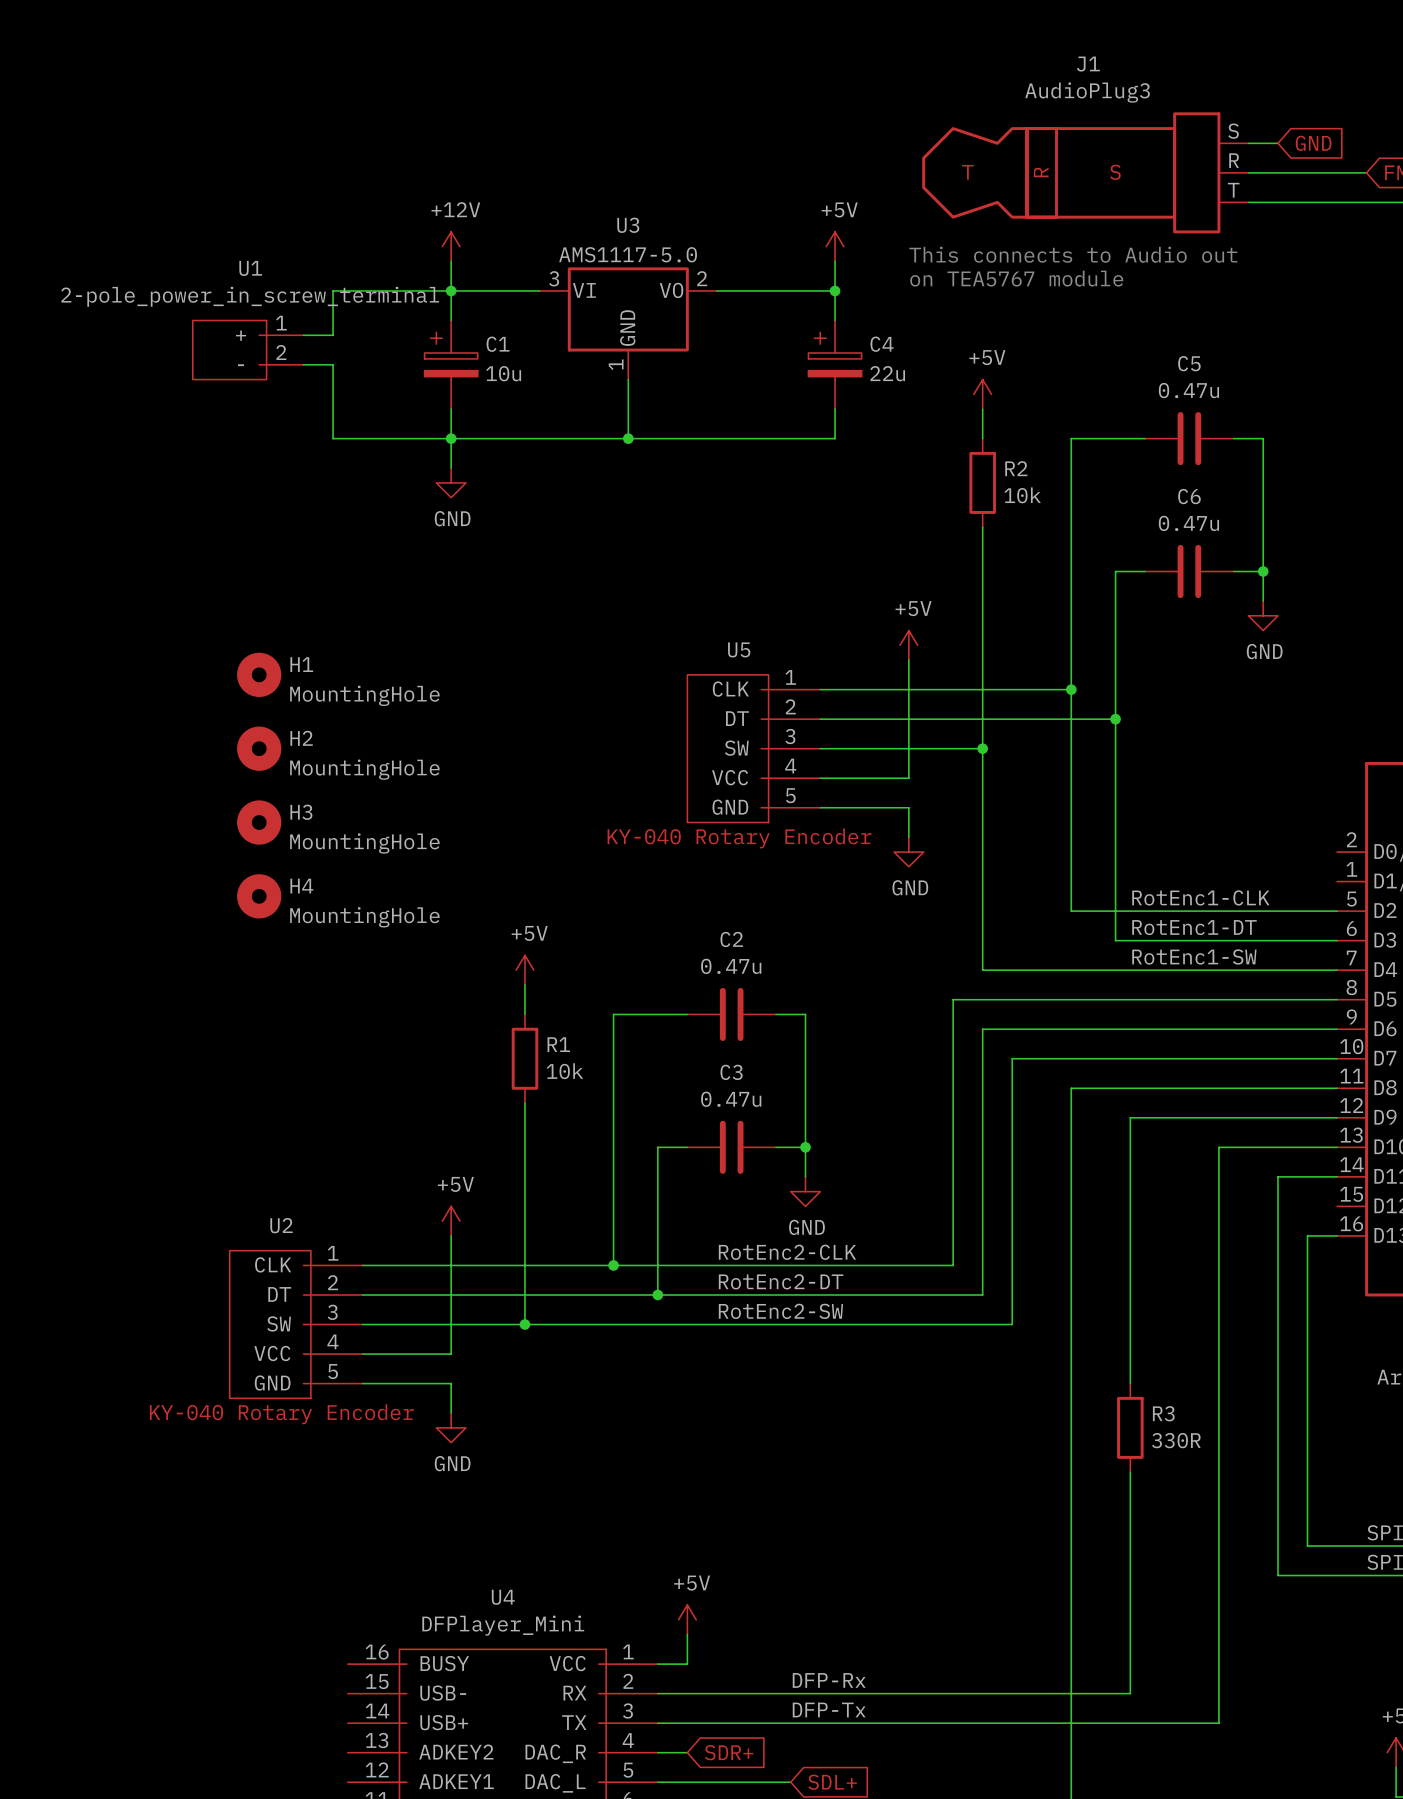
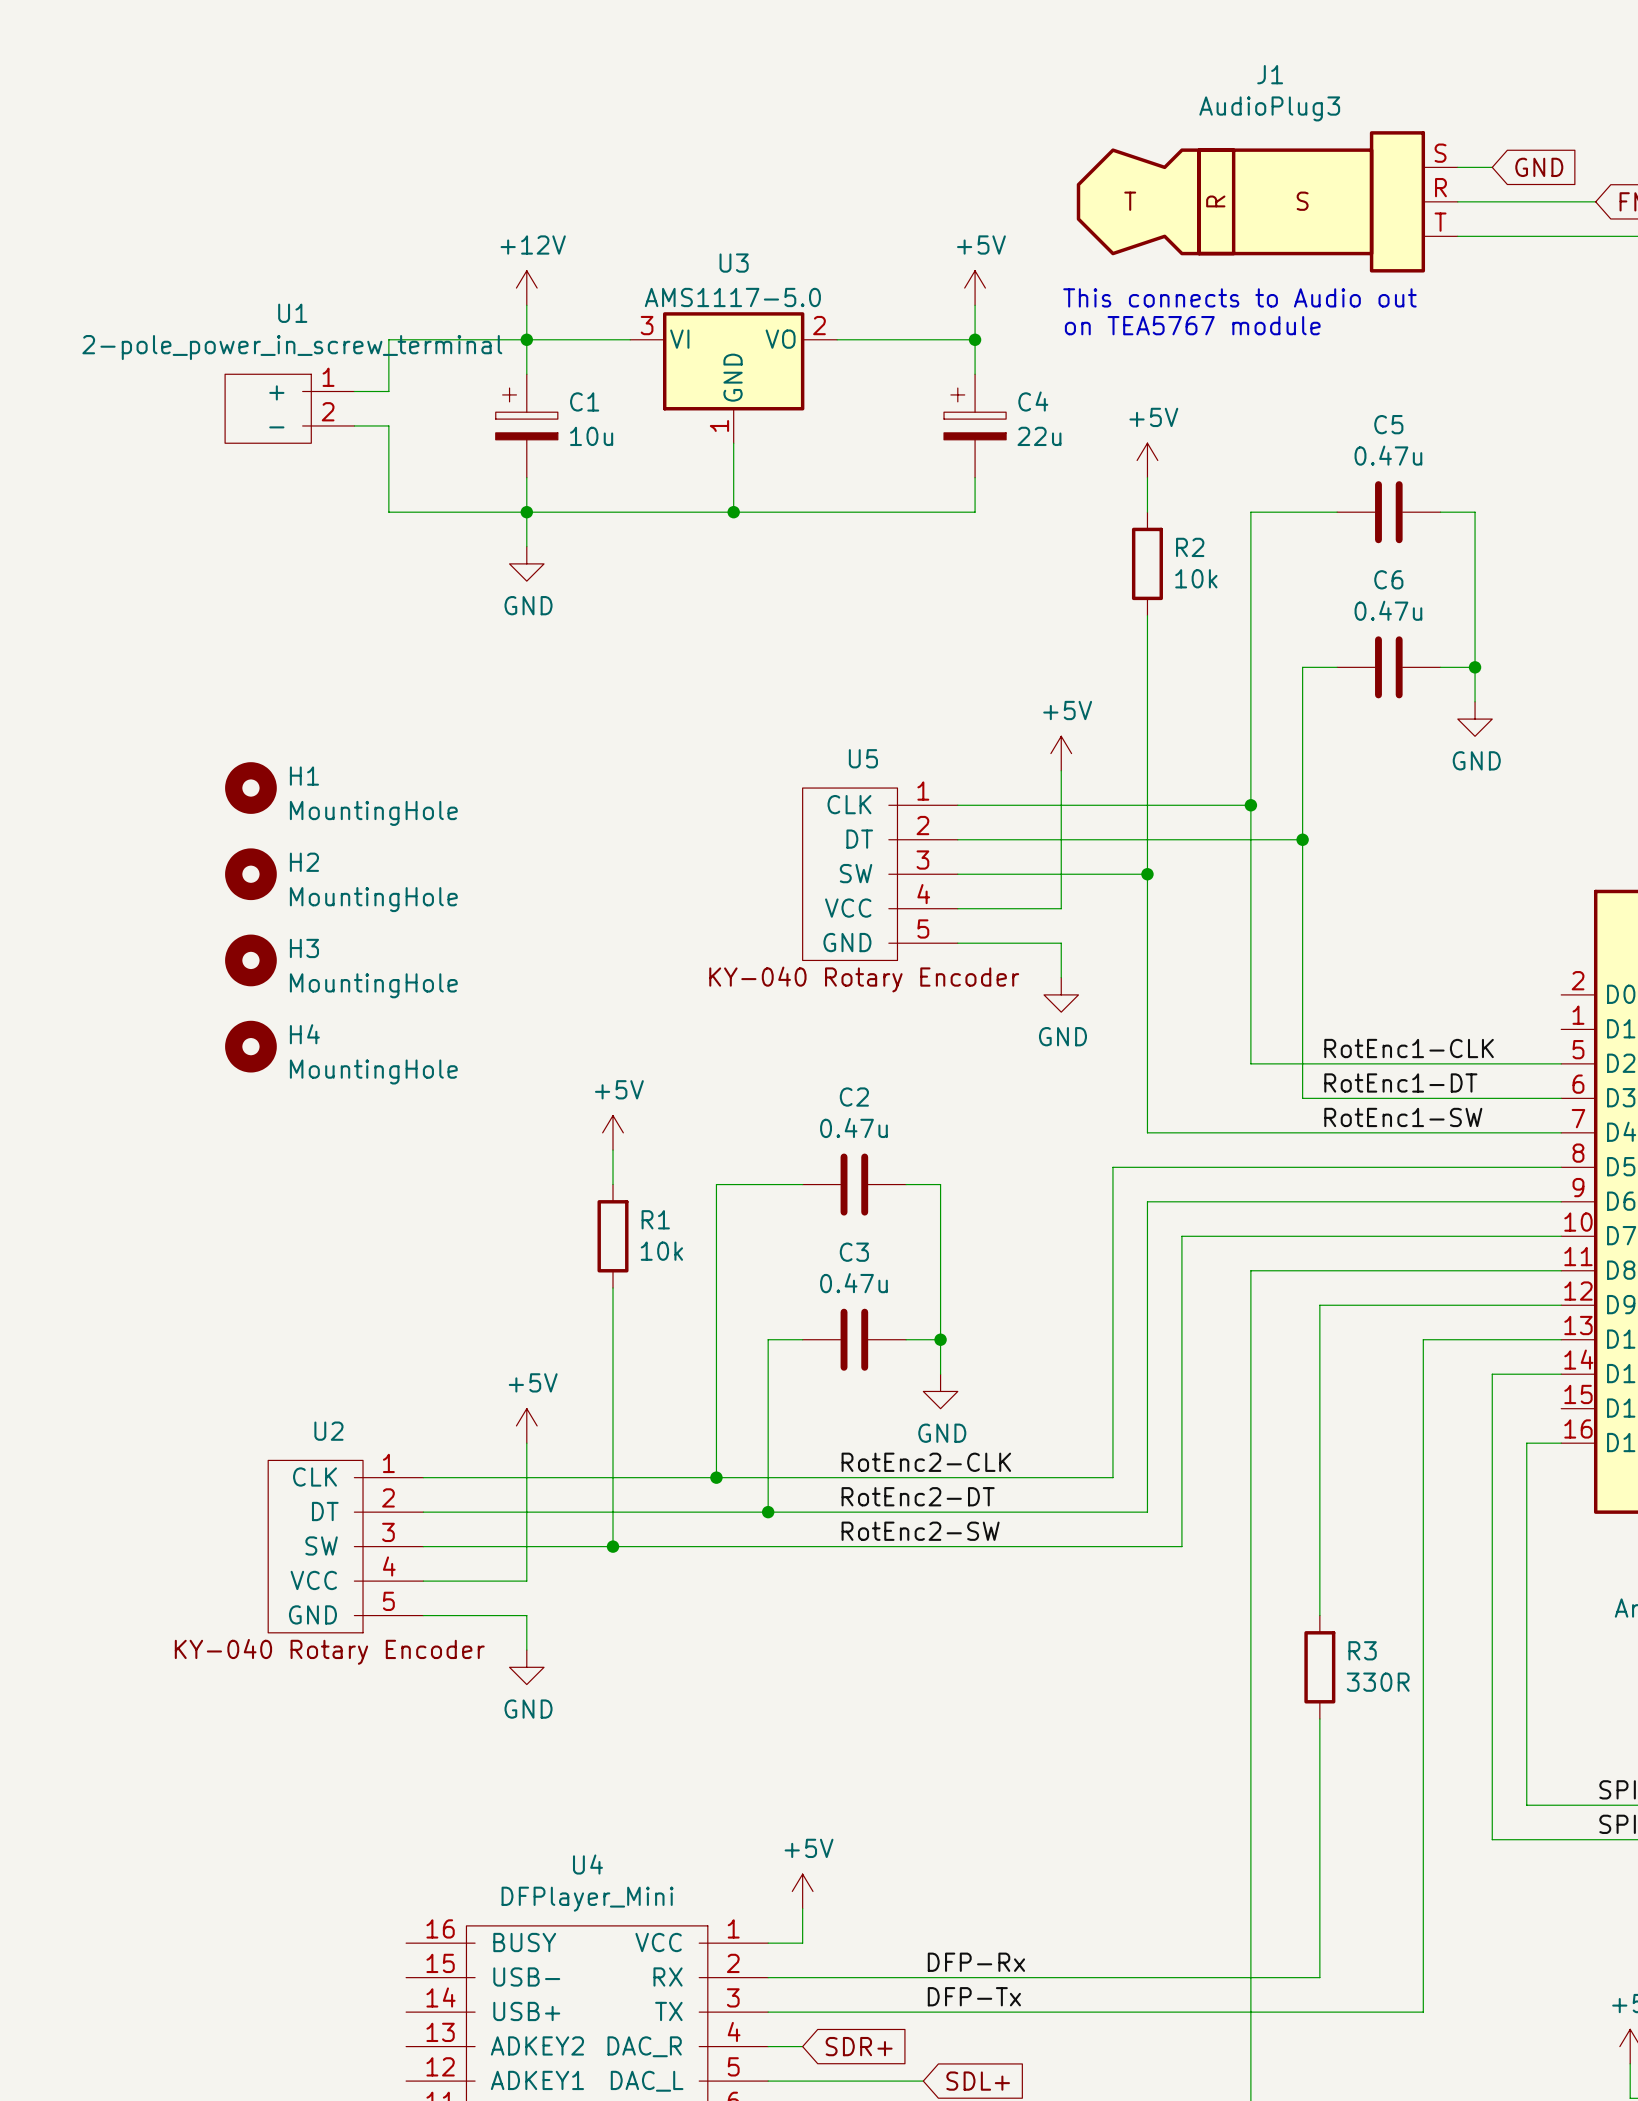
H1 position: (259, 674) -> (250, 788)
H2 position: (259, 748) -> (250, 874)
H3 position: (259, 822) -> (250, 960)
H4 position: (259, 896) -> (250, 1046)

